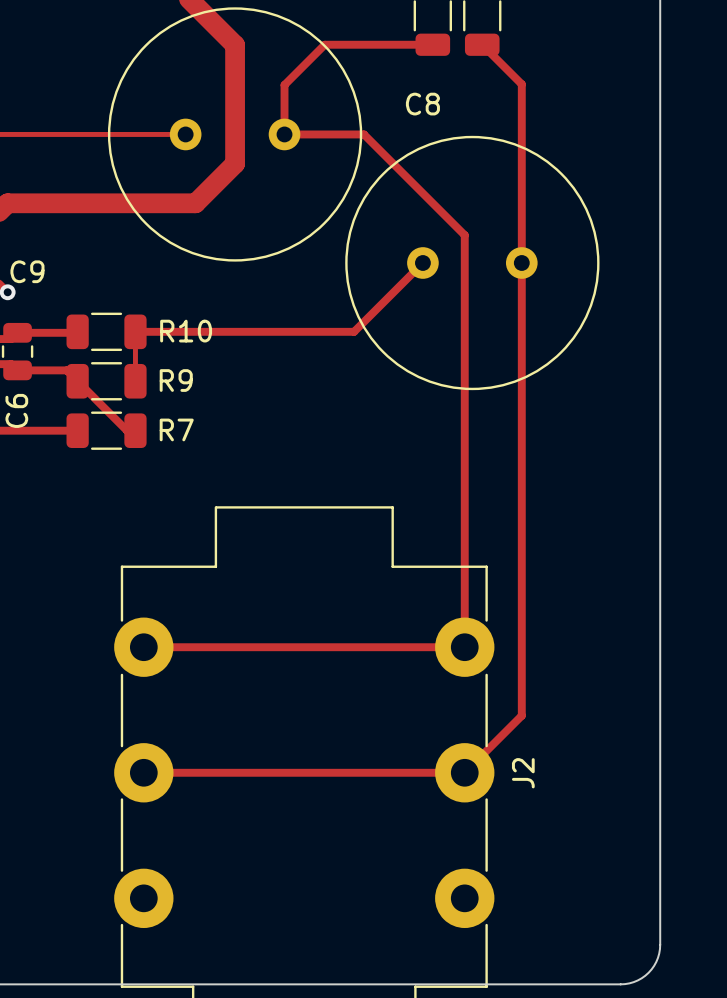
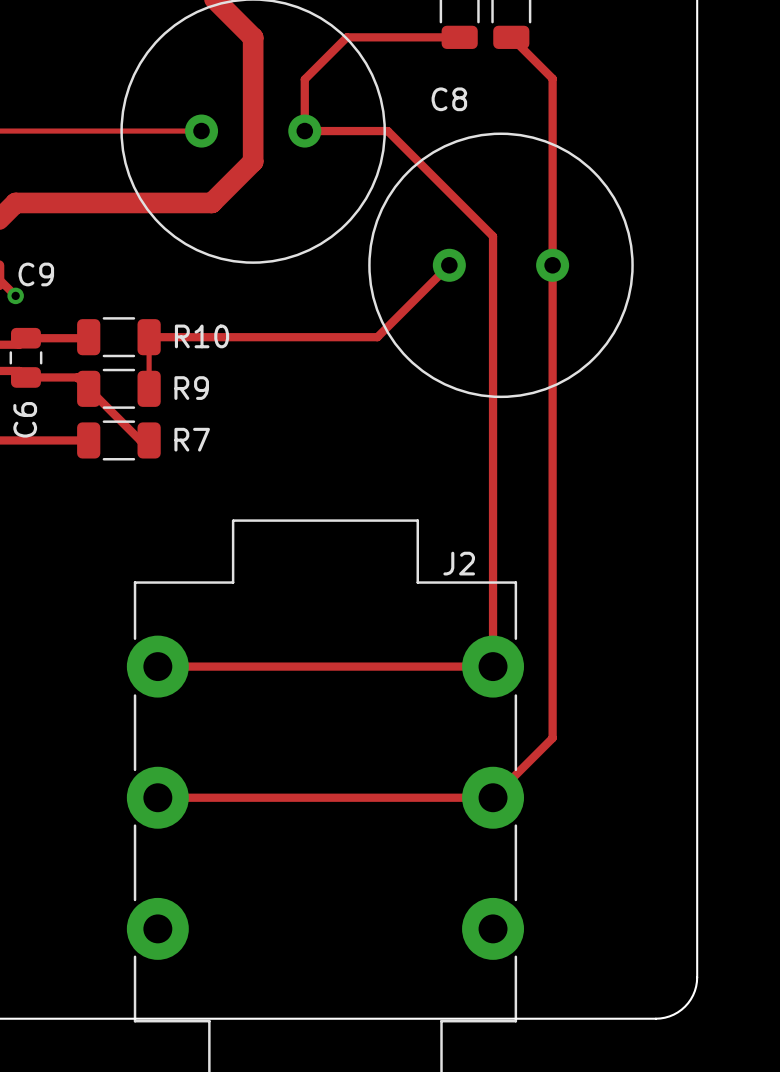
J2 name rotation: 0° (523, 773) -> 90° clockwise (459, 563)
J2 name position: J2 (523, 773) -> J2 (459, 563)

